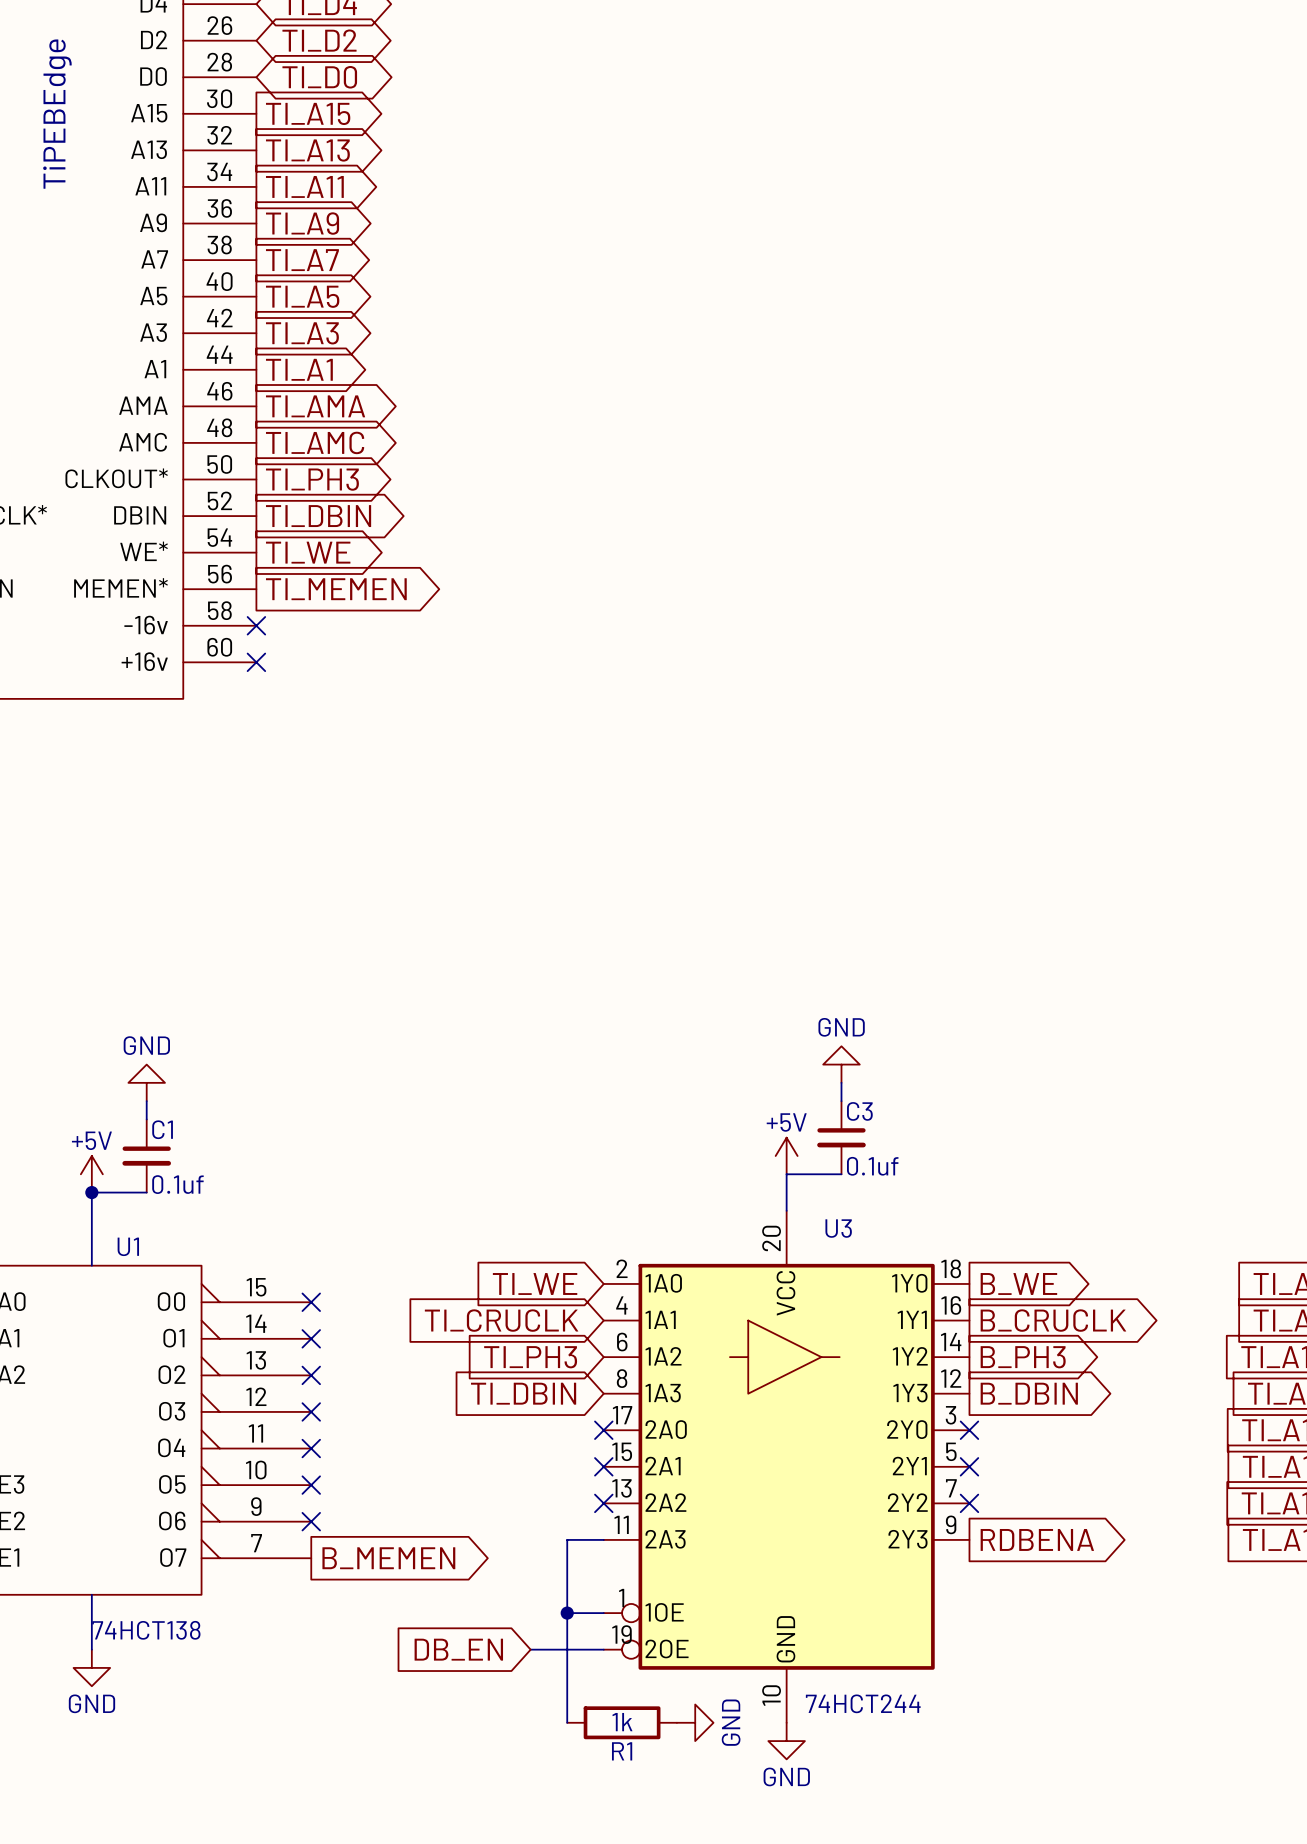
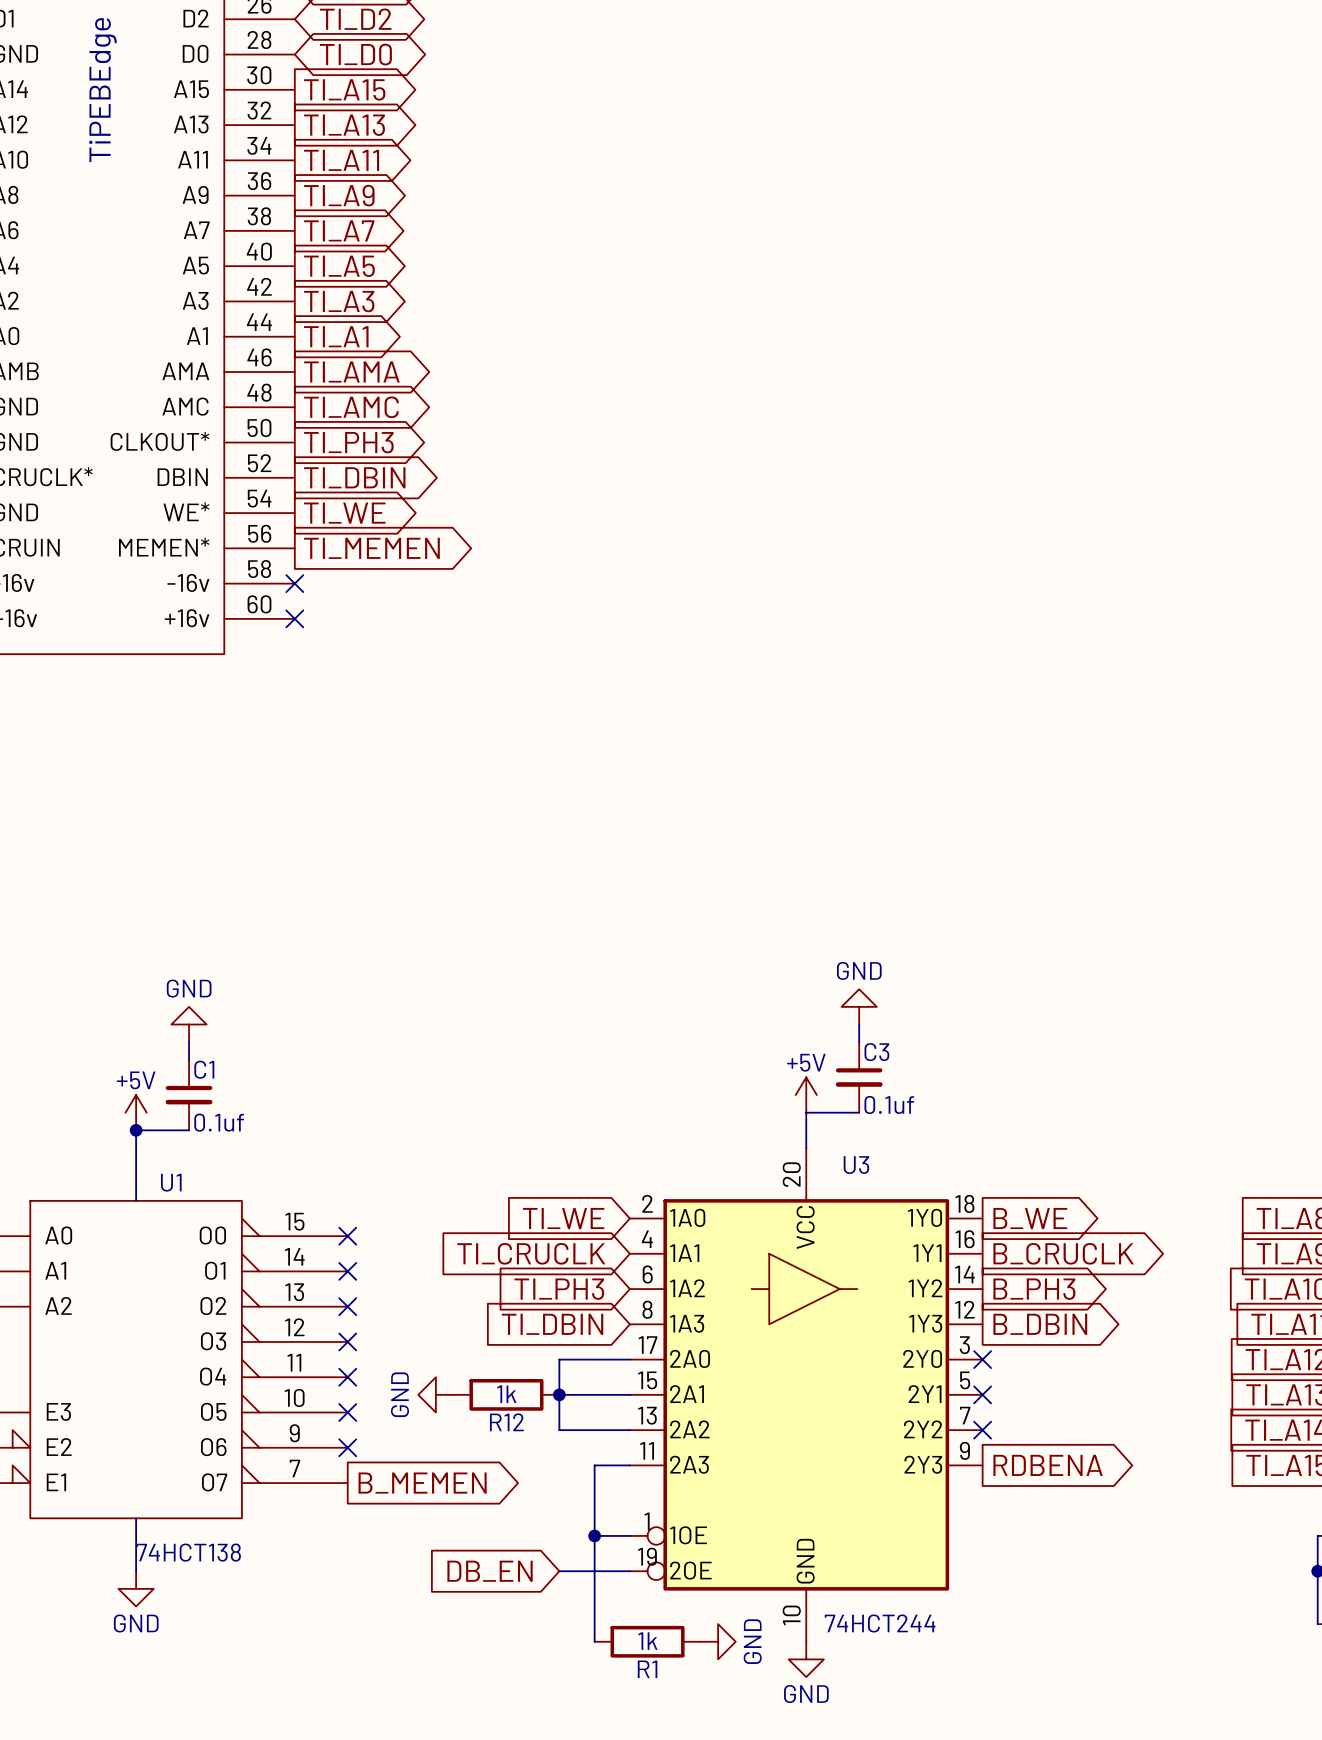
wire: none -> (629, 1359) (559, 1359) (559, 1430) (629, 1430)
no-connect mark: (603, 1430) -> none
power symbol: none -> GND (435, 1394)
R12: none -> 1k (506, 1394)
wire: none -> (559, 1394) (629, 1394)
junction: none -> (559, 1394)
no-connect mark: (603, 1466) -> none
no-connect mark: (603, 1503) -> none

